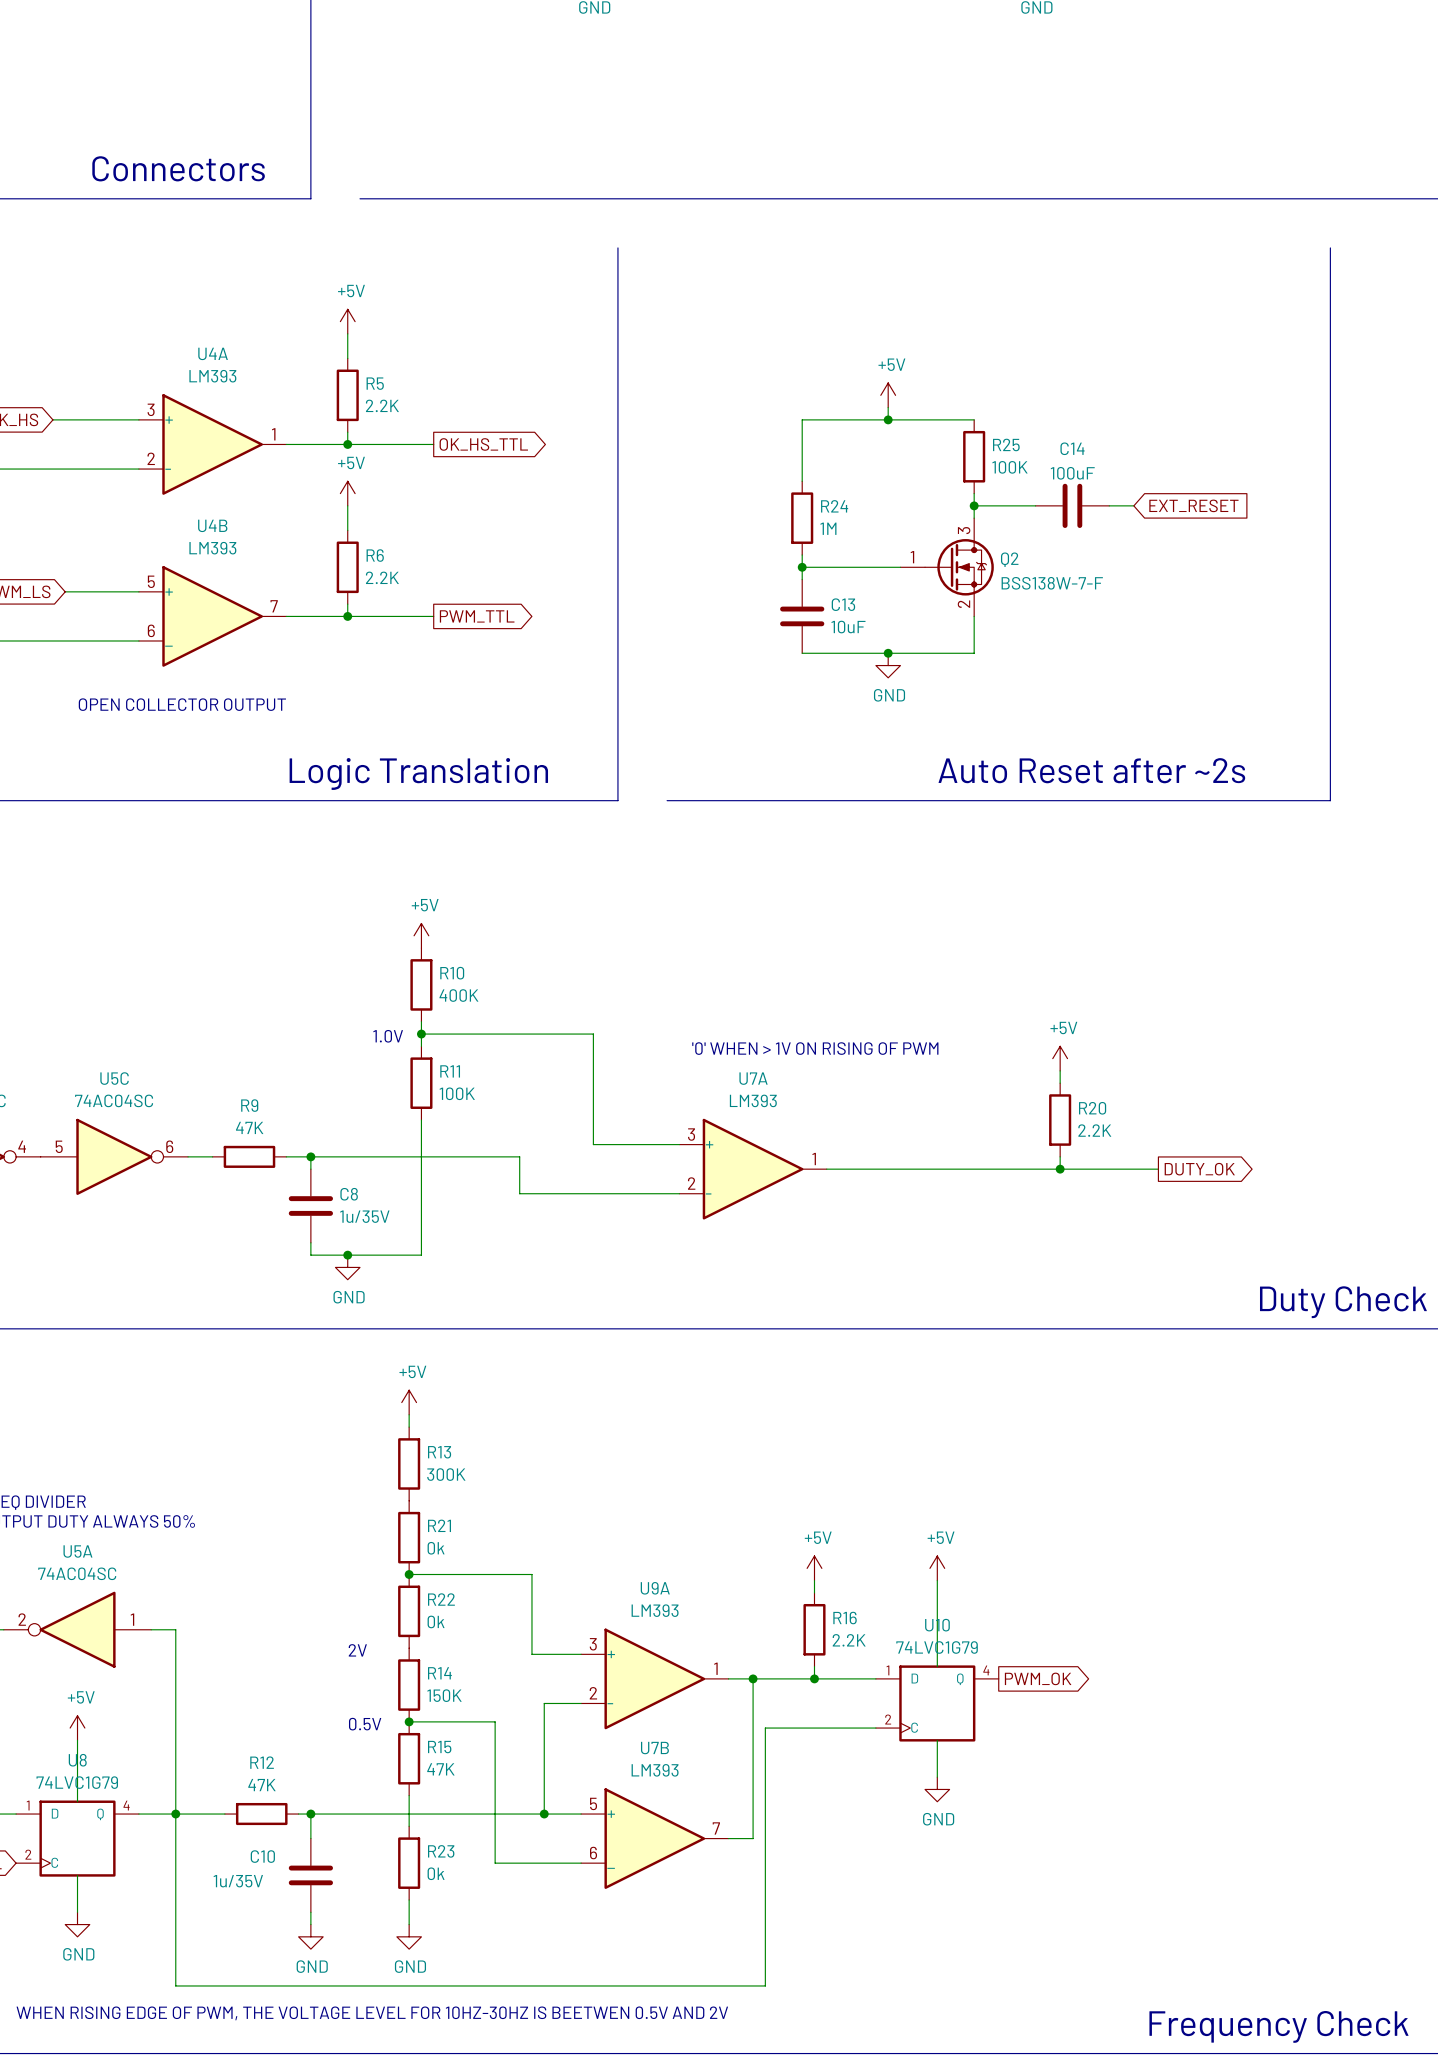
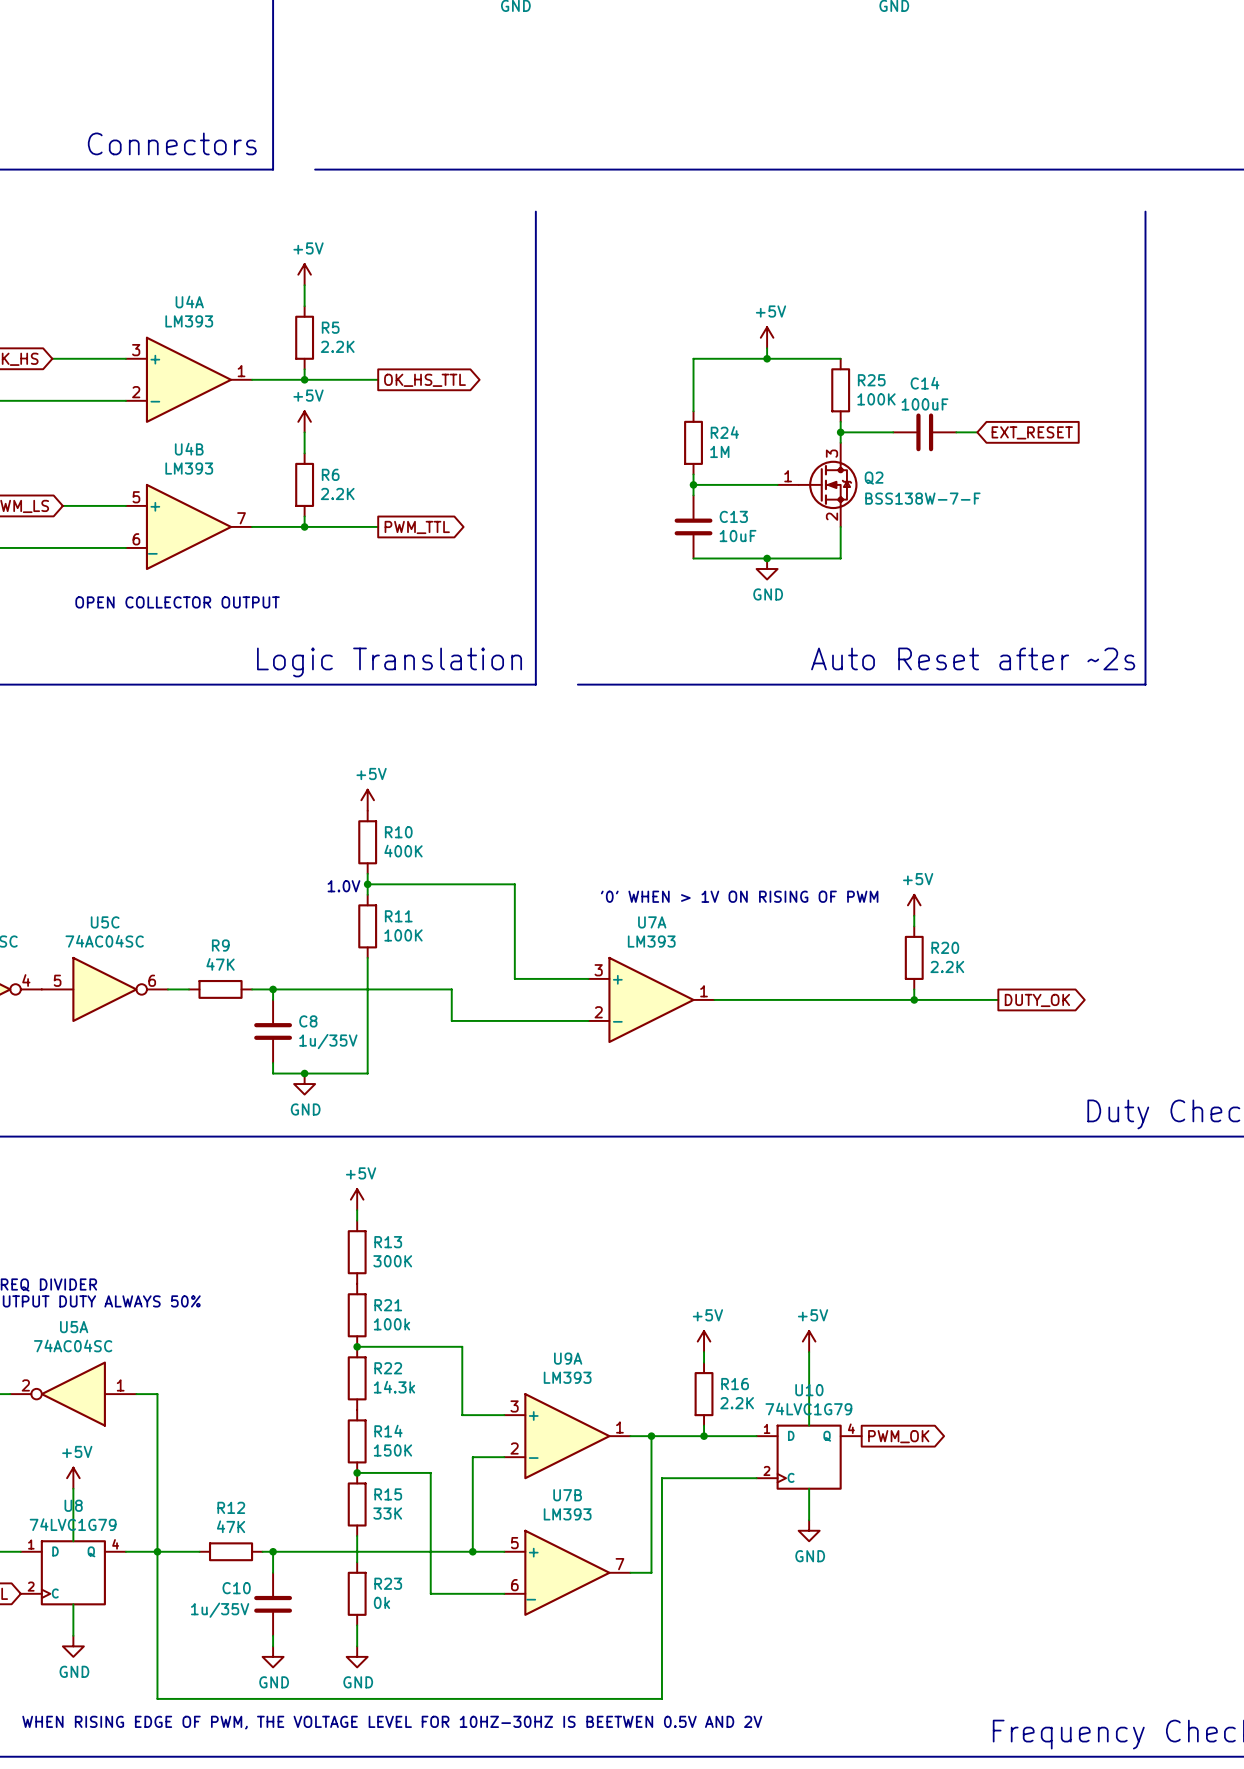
R21 value: 0k (436, 1548) -> 100k (391, 1324)
R22 value: 0k (436, 1621) -> 14.3k (394, 1387)
text: 2V (357, 1650) -> none
text: 0.5V (365, 1724) -> none
R15 value: 47K (440, 1769) -> 33K (387, 1513)

